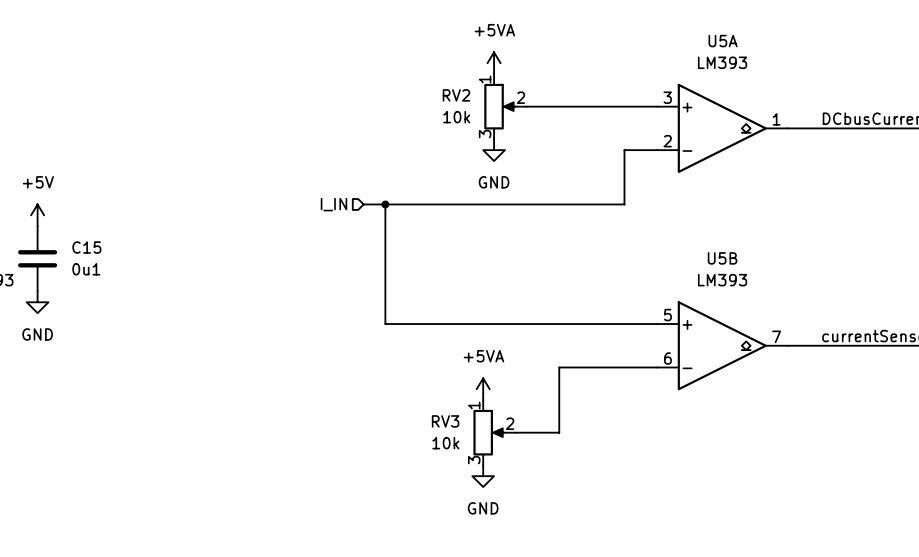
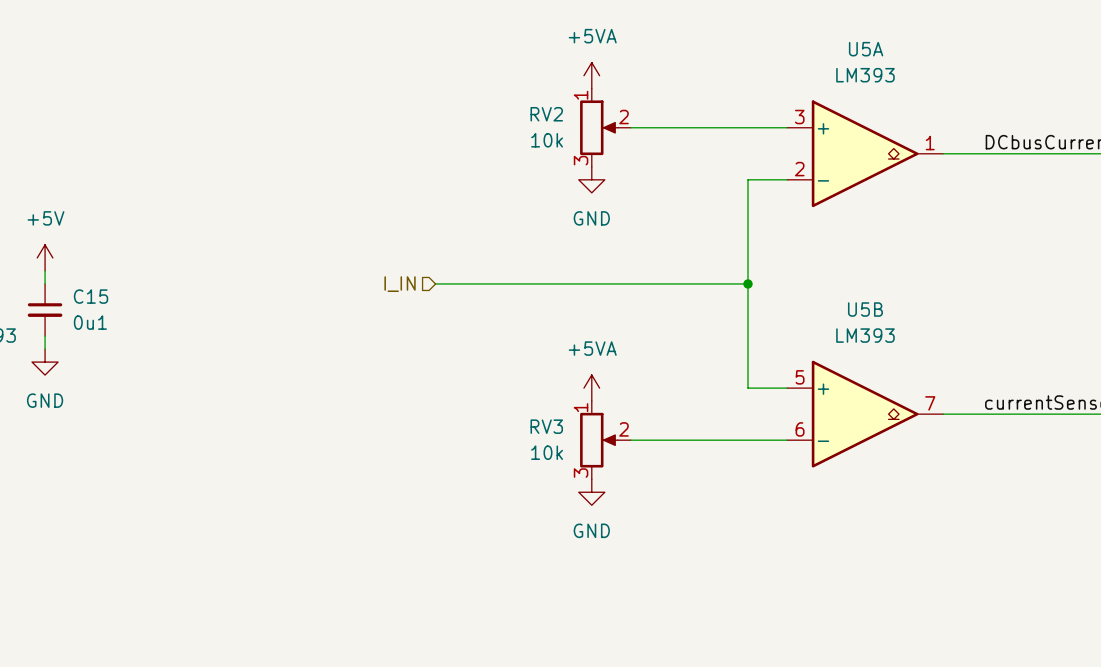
hierarchical label position: I_IN (333, 204) -> I_IN (400, 284)
wire: (363, 204) (624, 204) -> (435, 283) (748, 283)
wire: (385, 204) (385, 324) (624, 324) -> (748, 244) (748, 388)
junction: (385, 204) -> none
C15 symbol: [18, 226, 58, 292] -> [27, 283, 63, 337]
junction: none -> (748, 283)
wire: (559, 367) (559, 432) (515, 432) -> (669, 440) (630, 440)
power symbol position: +5VA (483, 389) -> +5VA (591, 388)
RV3 position: (494, 432) -> (605, 440)
power symbol position: GND (483, 476) -> GND (591, 492)

